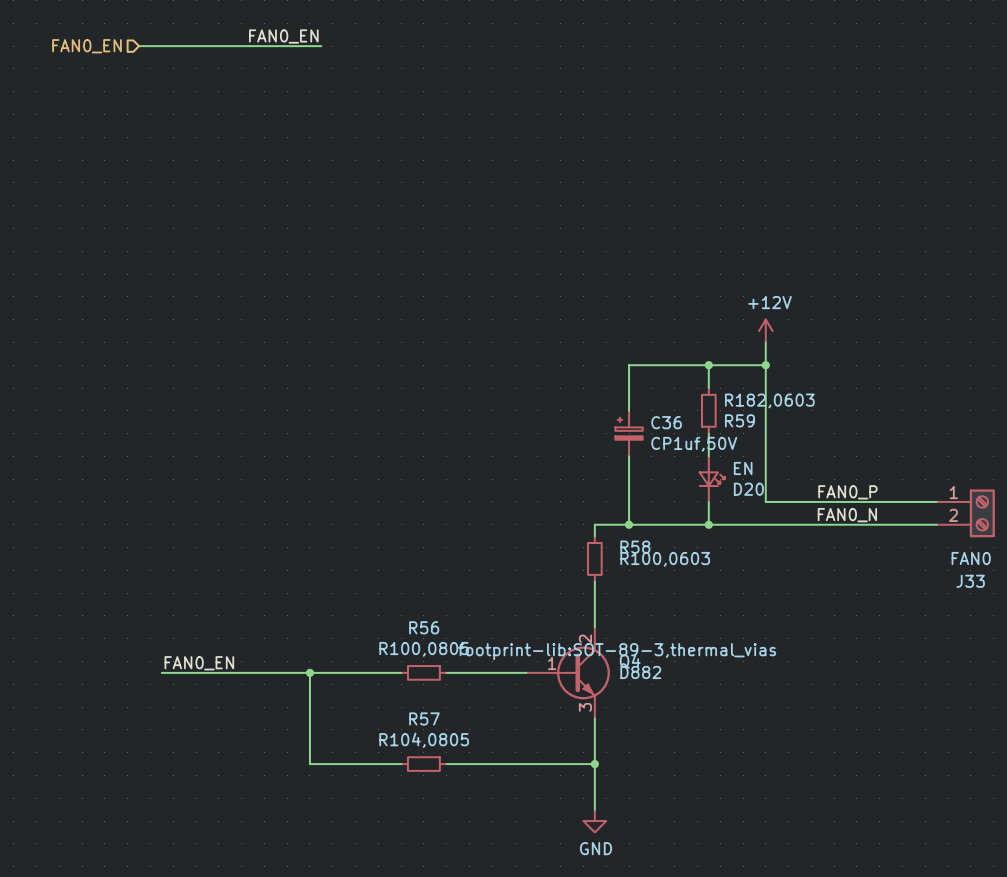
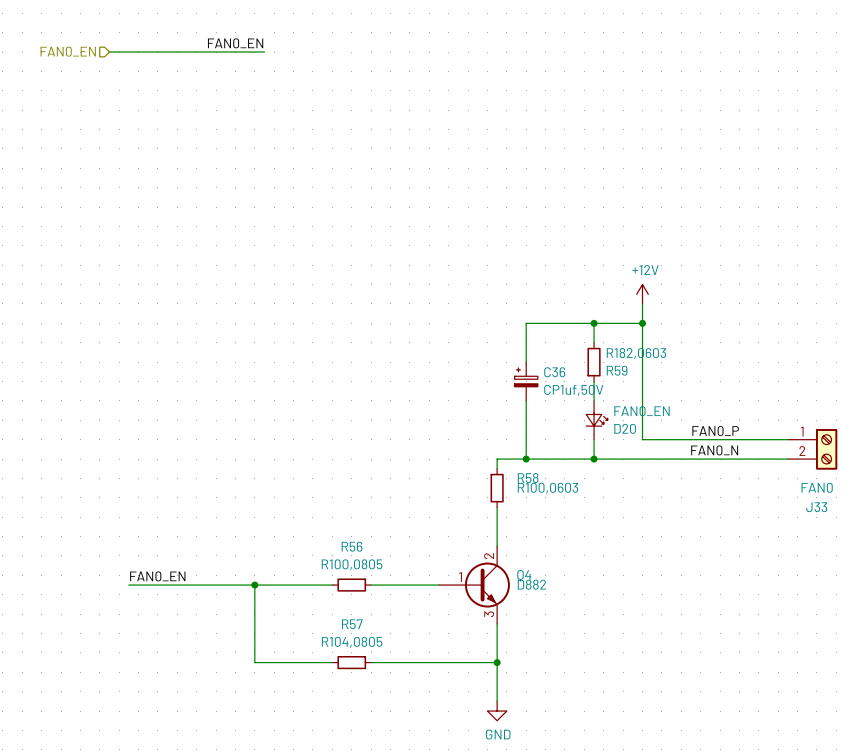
D20 value: EN (743, 468) -> FAN0_EN (641, 411)
Q4 text: footprint-lib:SOT-89-3,thermal_vias (617, 651) -> none

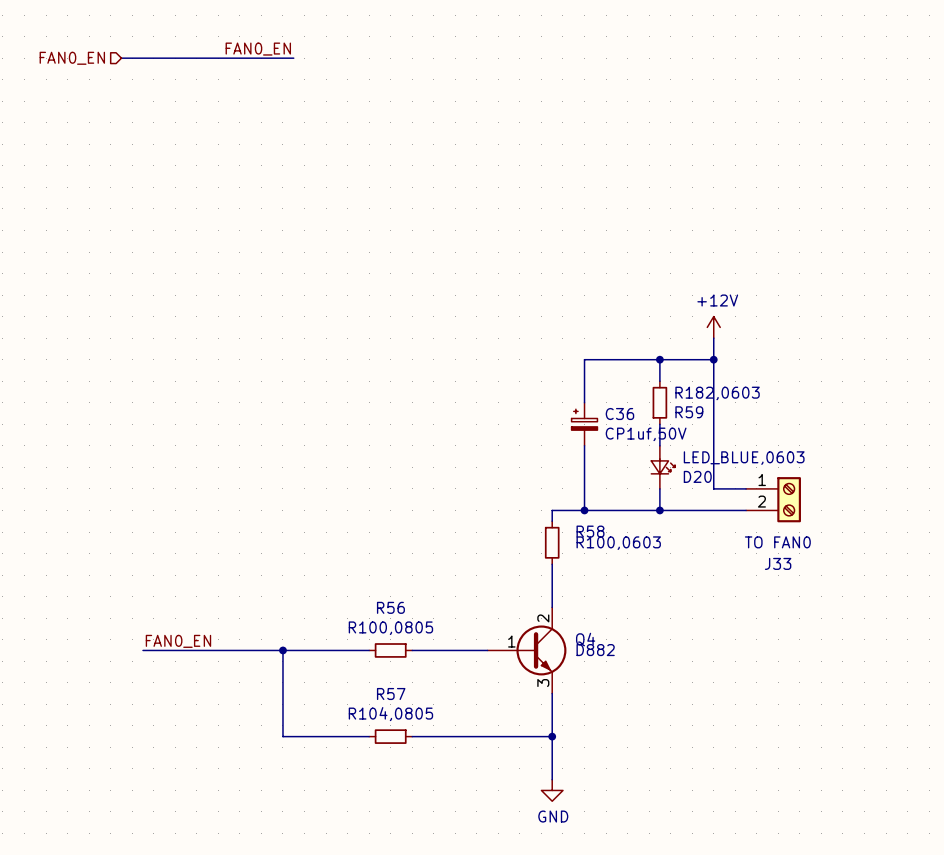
D20 value: FAN0_EN (641, 411) -> LED_BLUE,0603 (744, 458)
label: FAN0_P (715, 431) -> none
wire: (671, 439) (787, 439) -> none
J33 position: (812, 449) -> (773, 499)
label: FAN0_N (714, 450) -> none
wire: (671, 459) (787, 459) -> none
J33 value: FAN0 (817, 487) -> TO FAN0 (777, 542)

